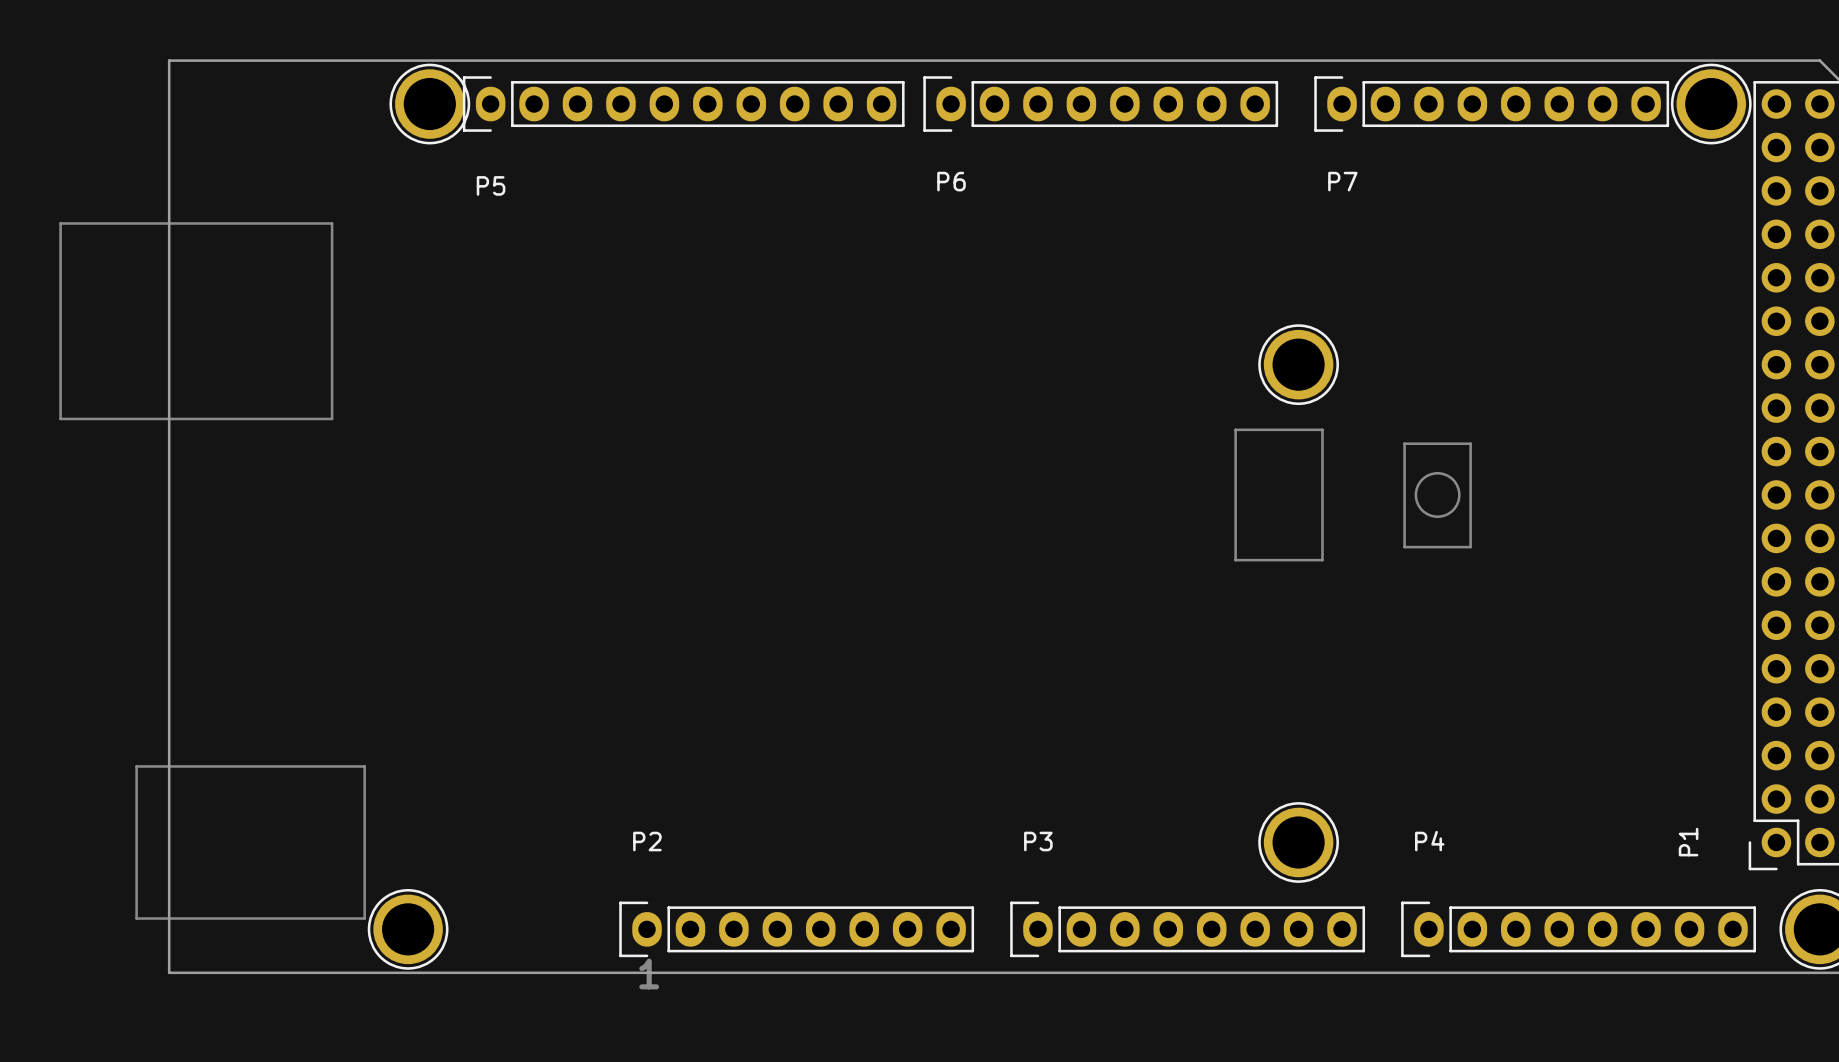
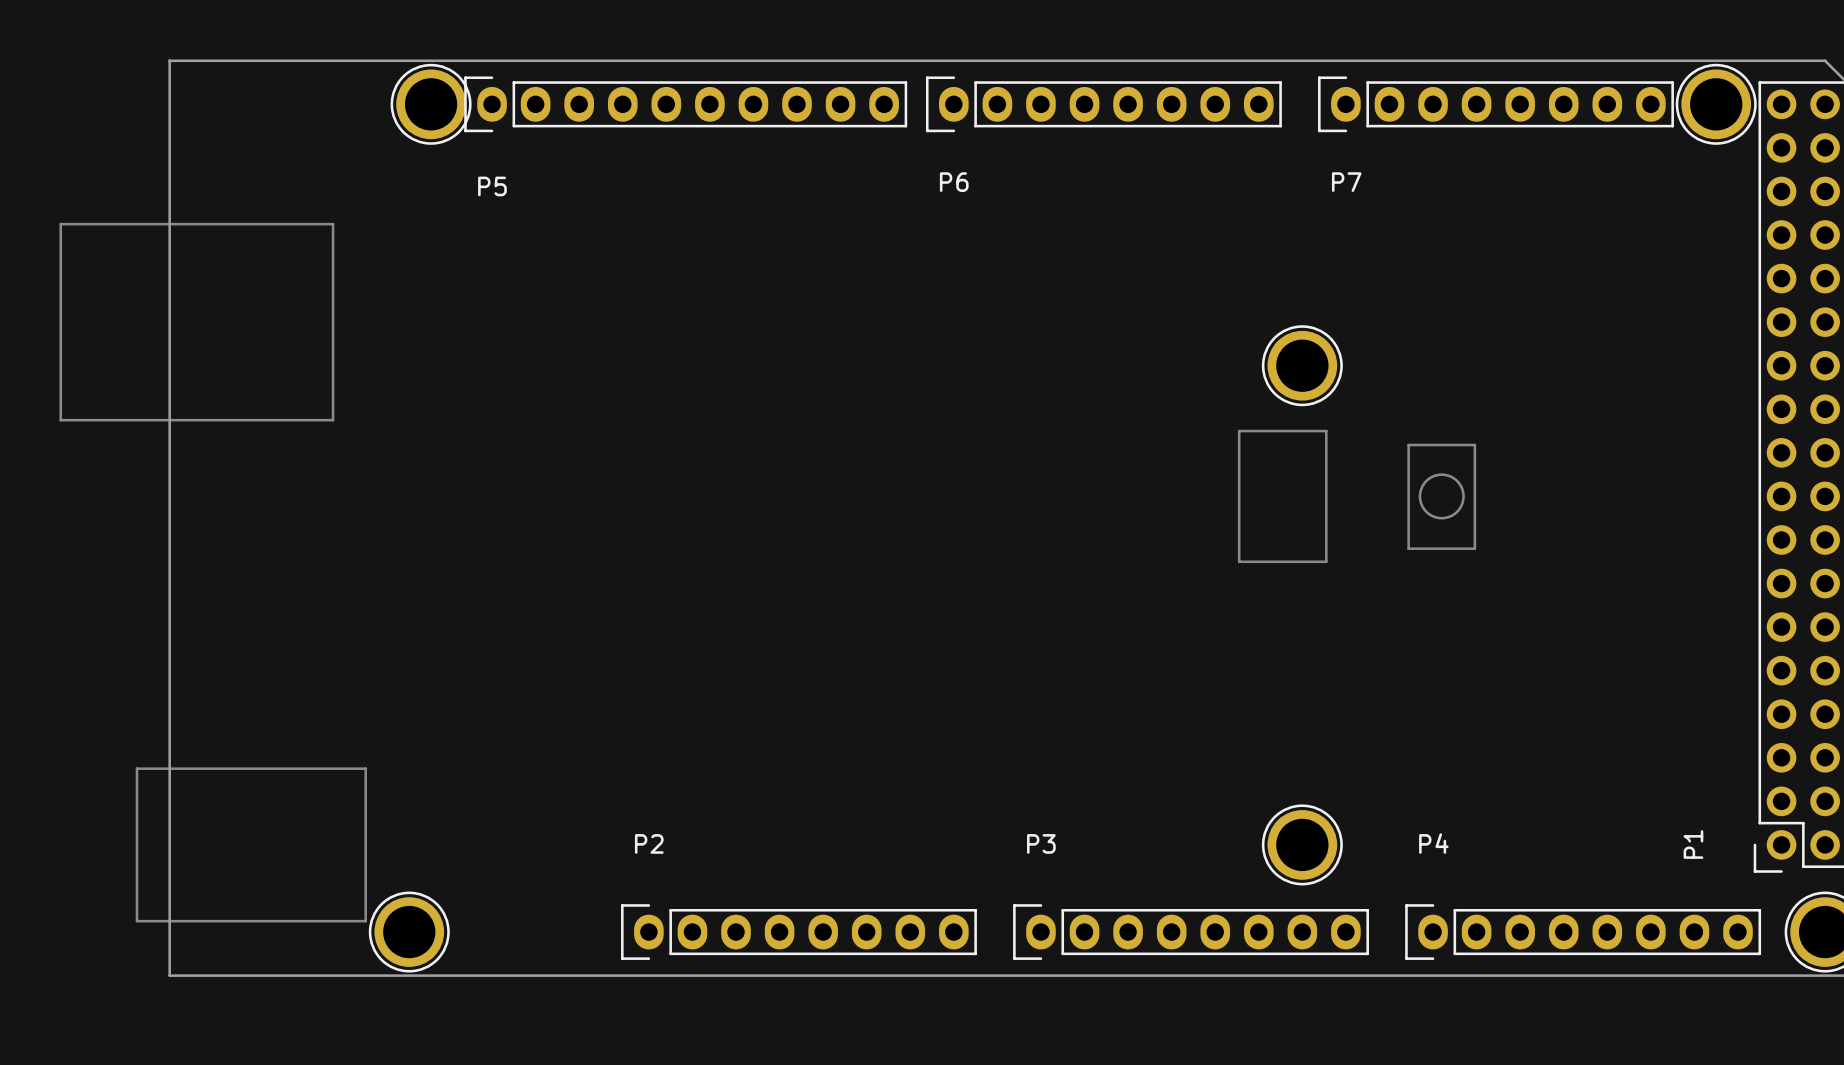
text: 1 (649, 974) -> none

